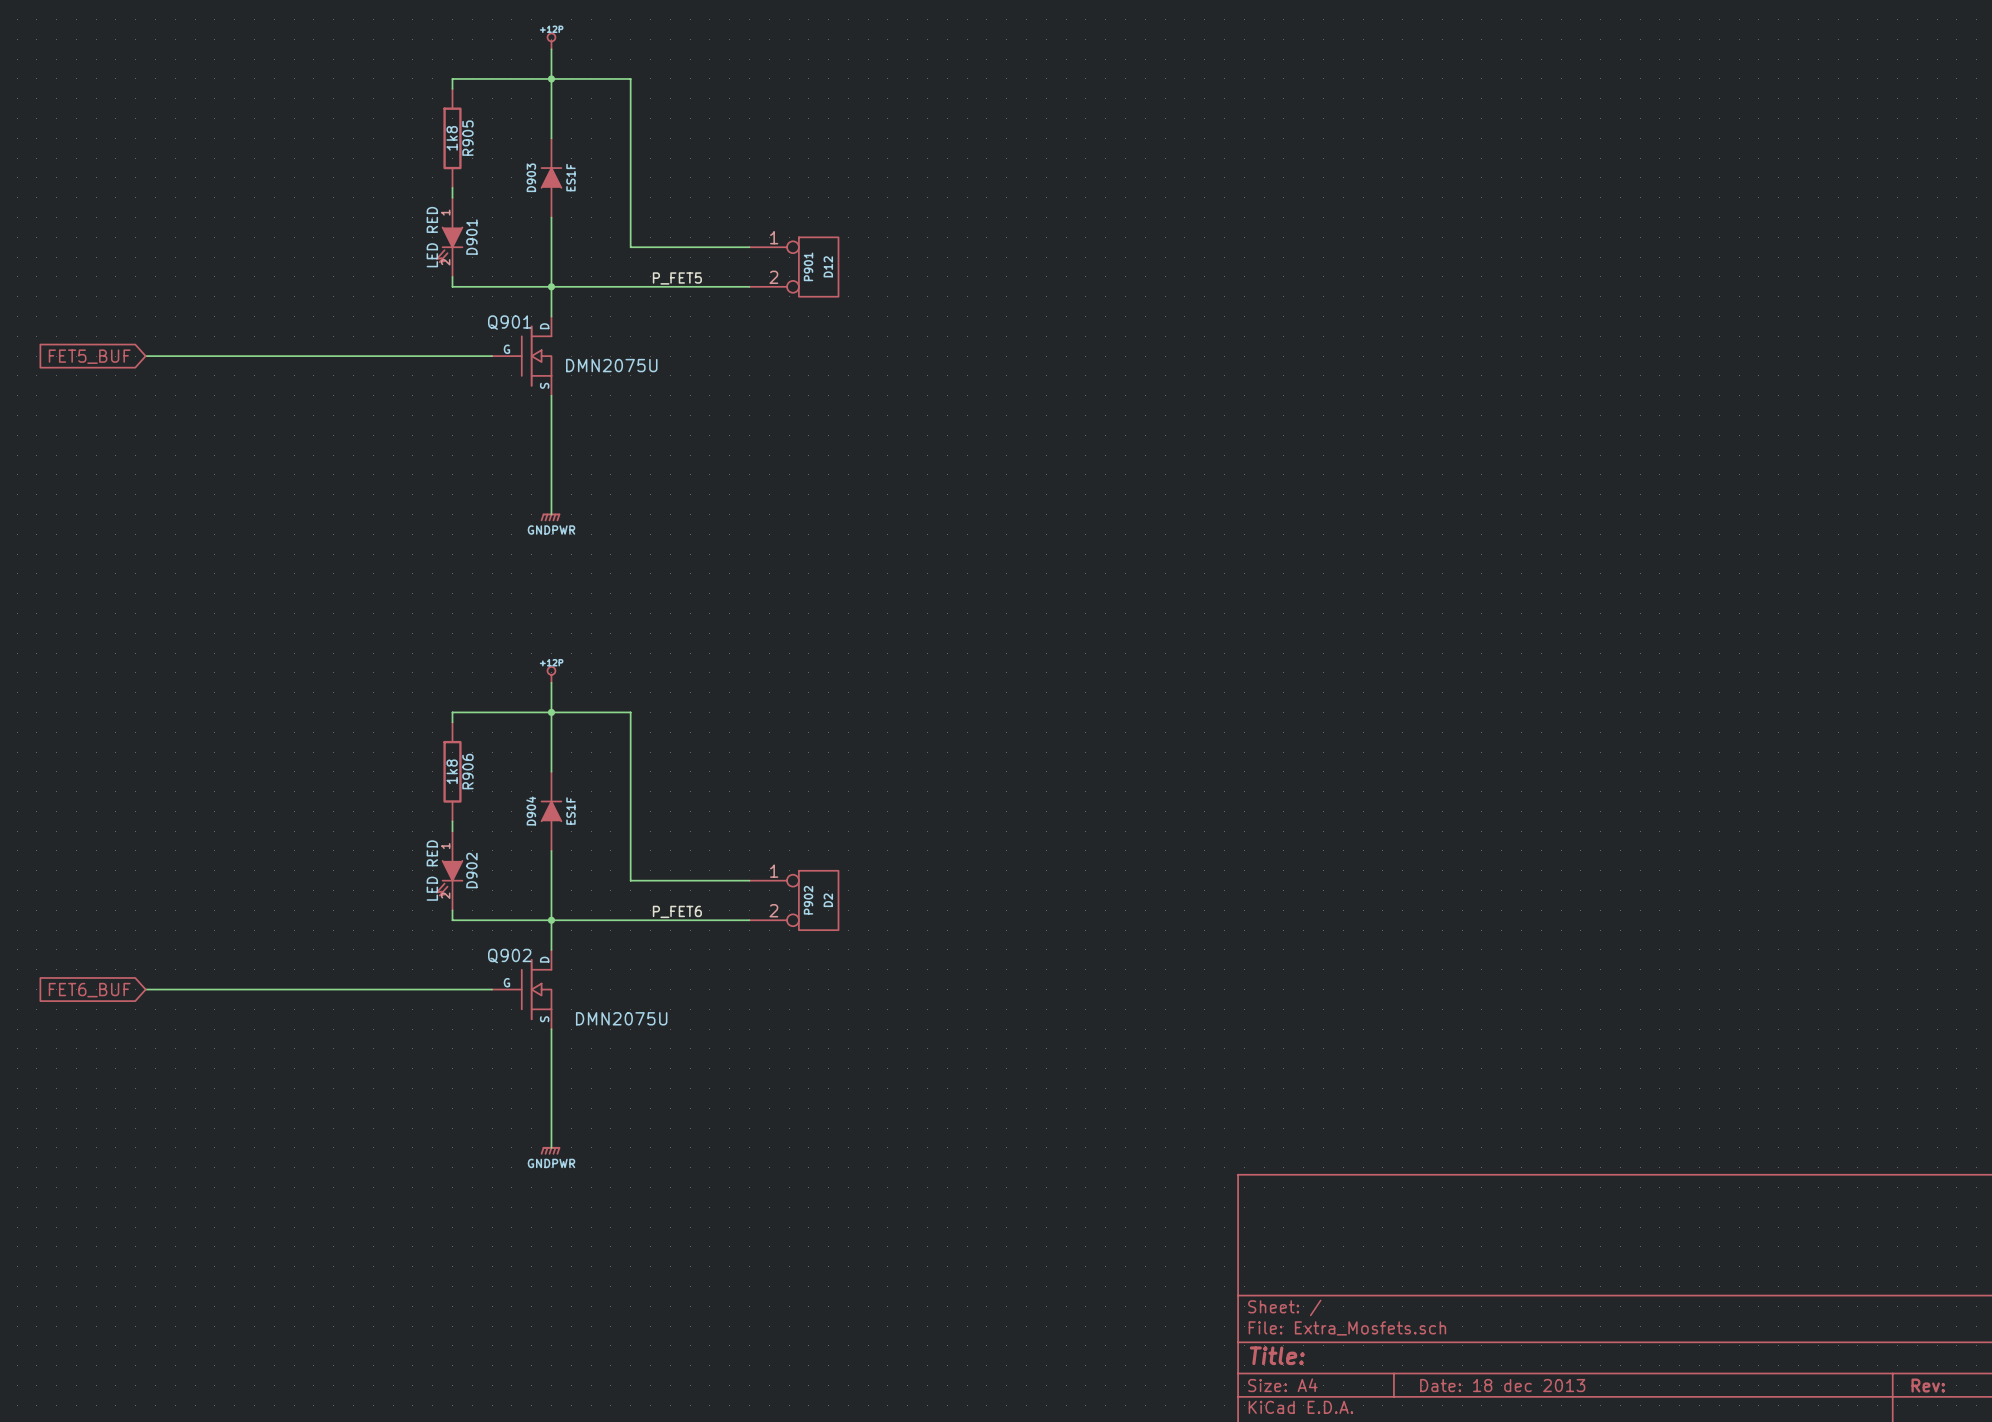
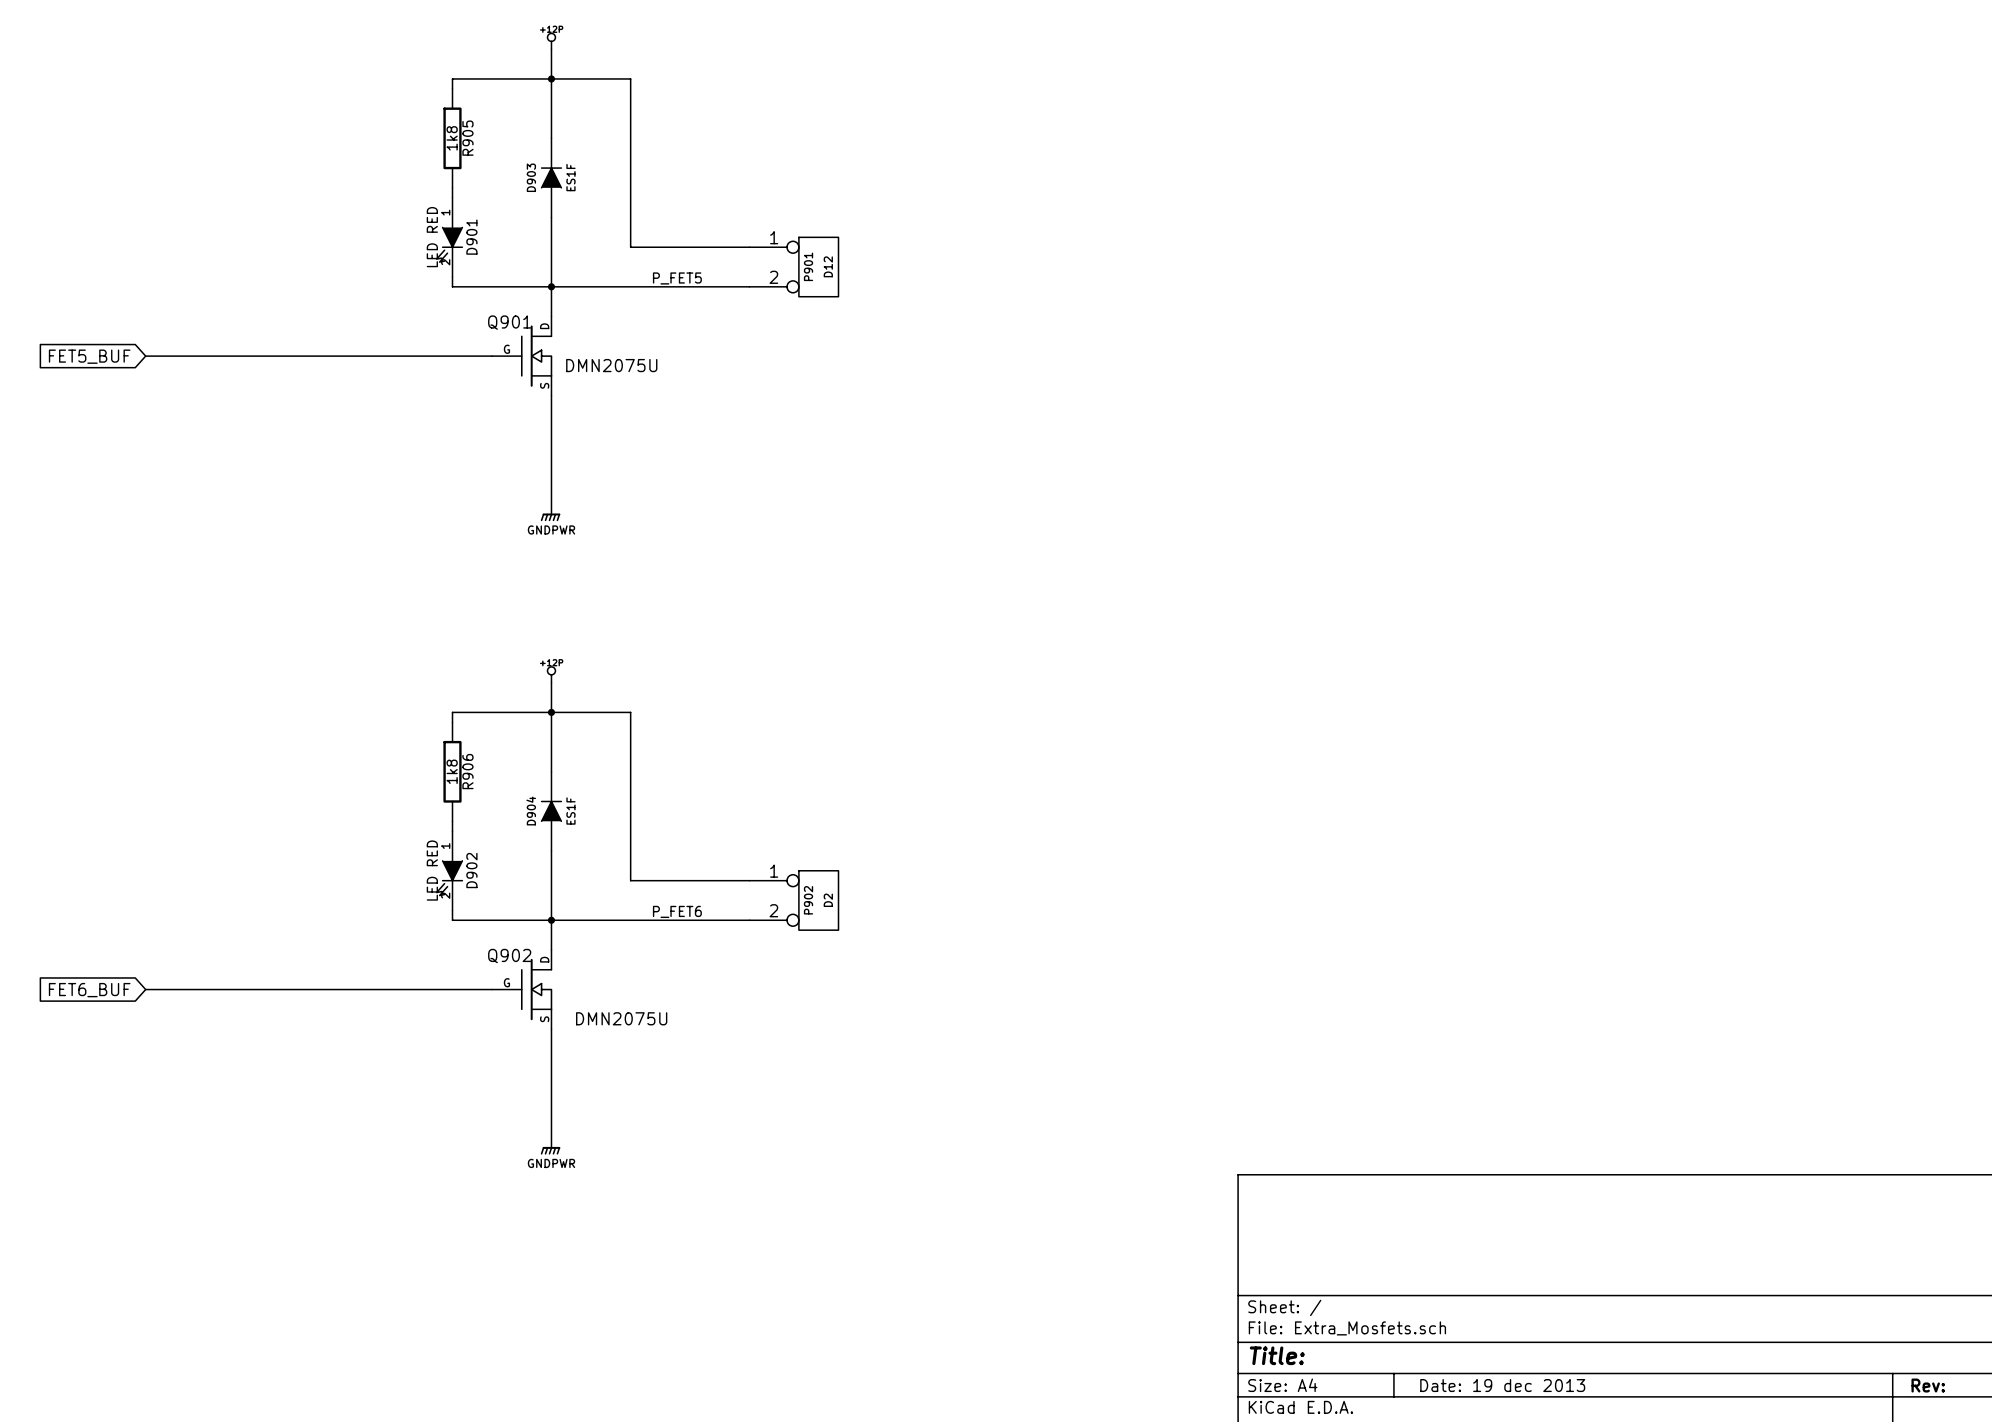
title block: Date: 18 dec 2013 (1502, 1385) -> Date: 19 dec 2013 (1502, 1385)

